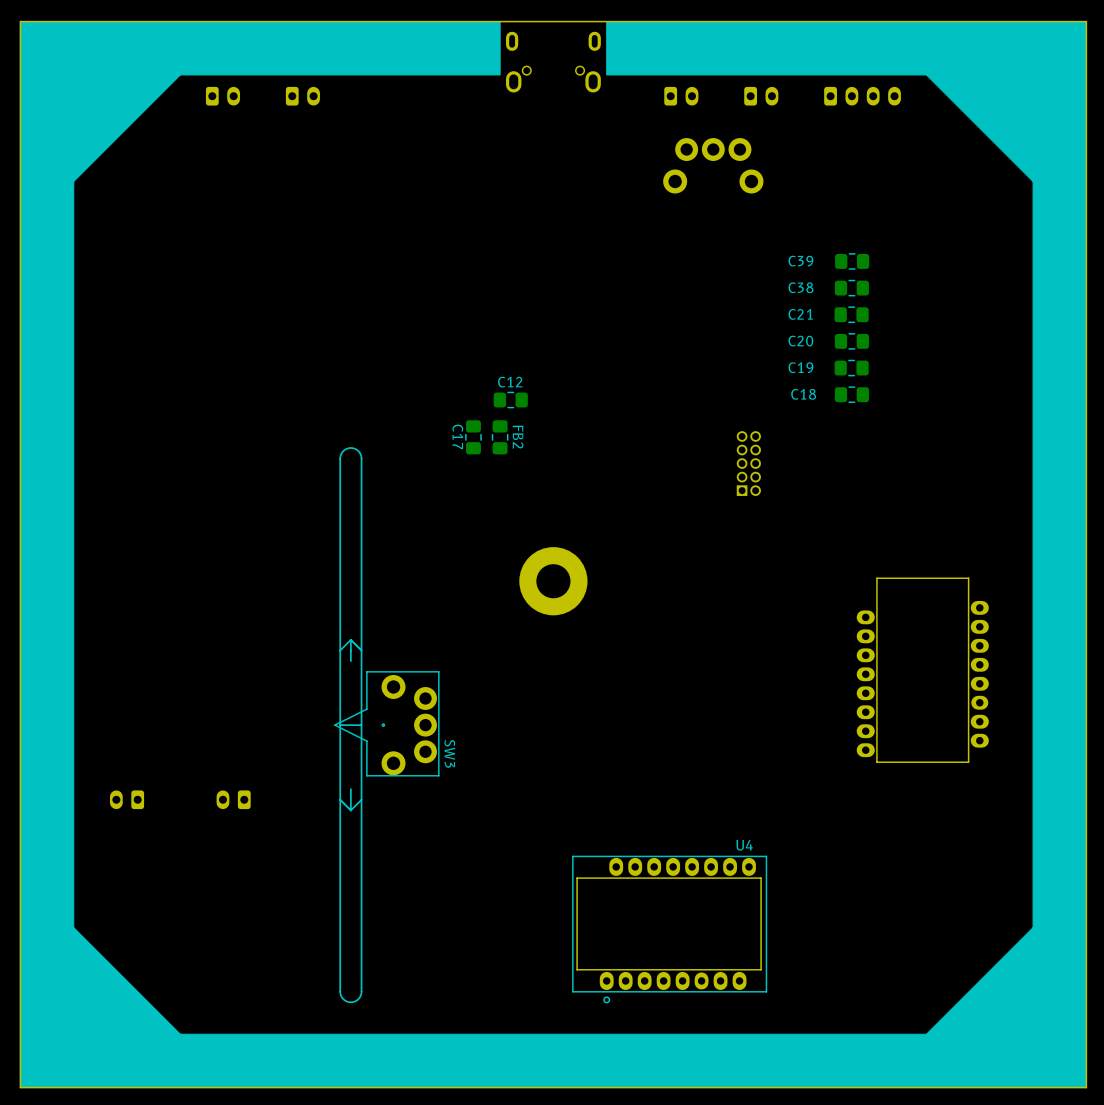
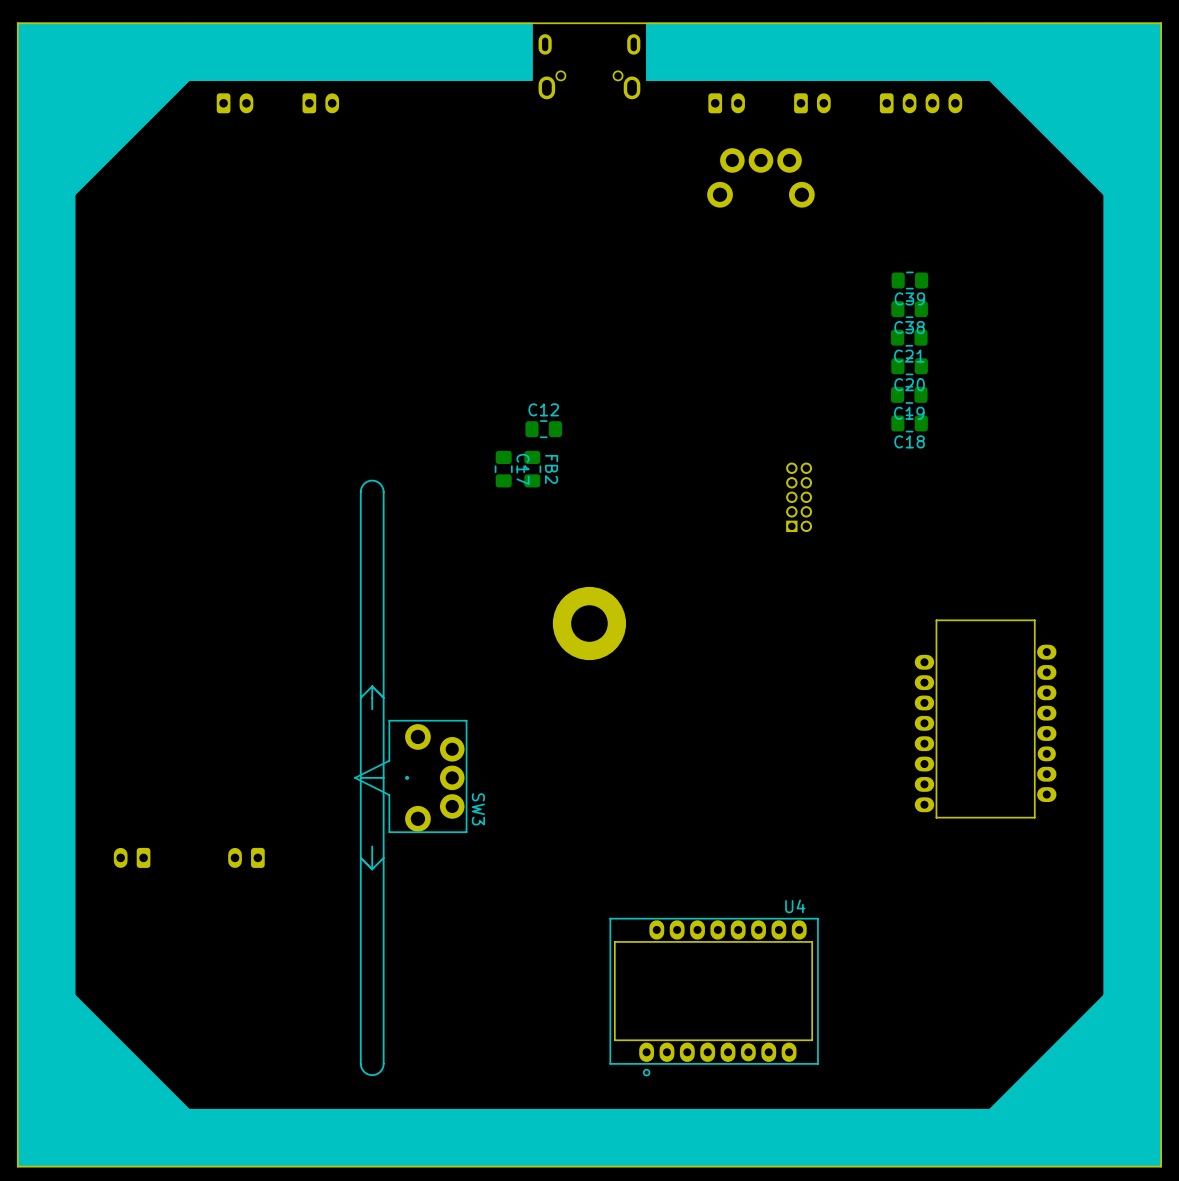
C39 name position: C39 (800, 261) -> C39 (909, 298)
C38 name position: C38 (800, 287) -> C38 (909, 327)
C21 name position: C21 (800, 314) -> C21 (909, 356)
C20 name position: C20 (800, 341) -> C20 (909, 384)
C19 name position: C19 (800, 367) -> C19 (909, 413)
C18 name position: C18 (803, 394) -> C18 (909, 441)
C17 name position: C17 (457, 436) -> C17 (522, 469)

